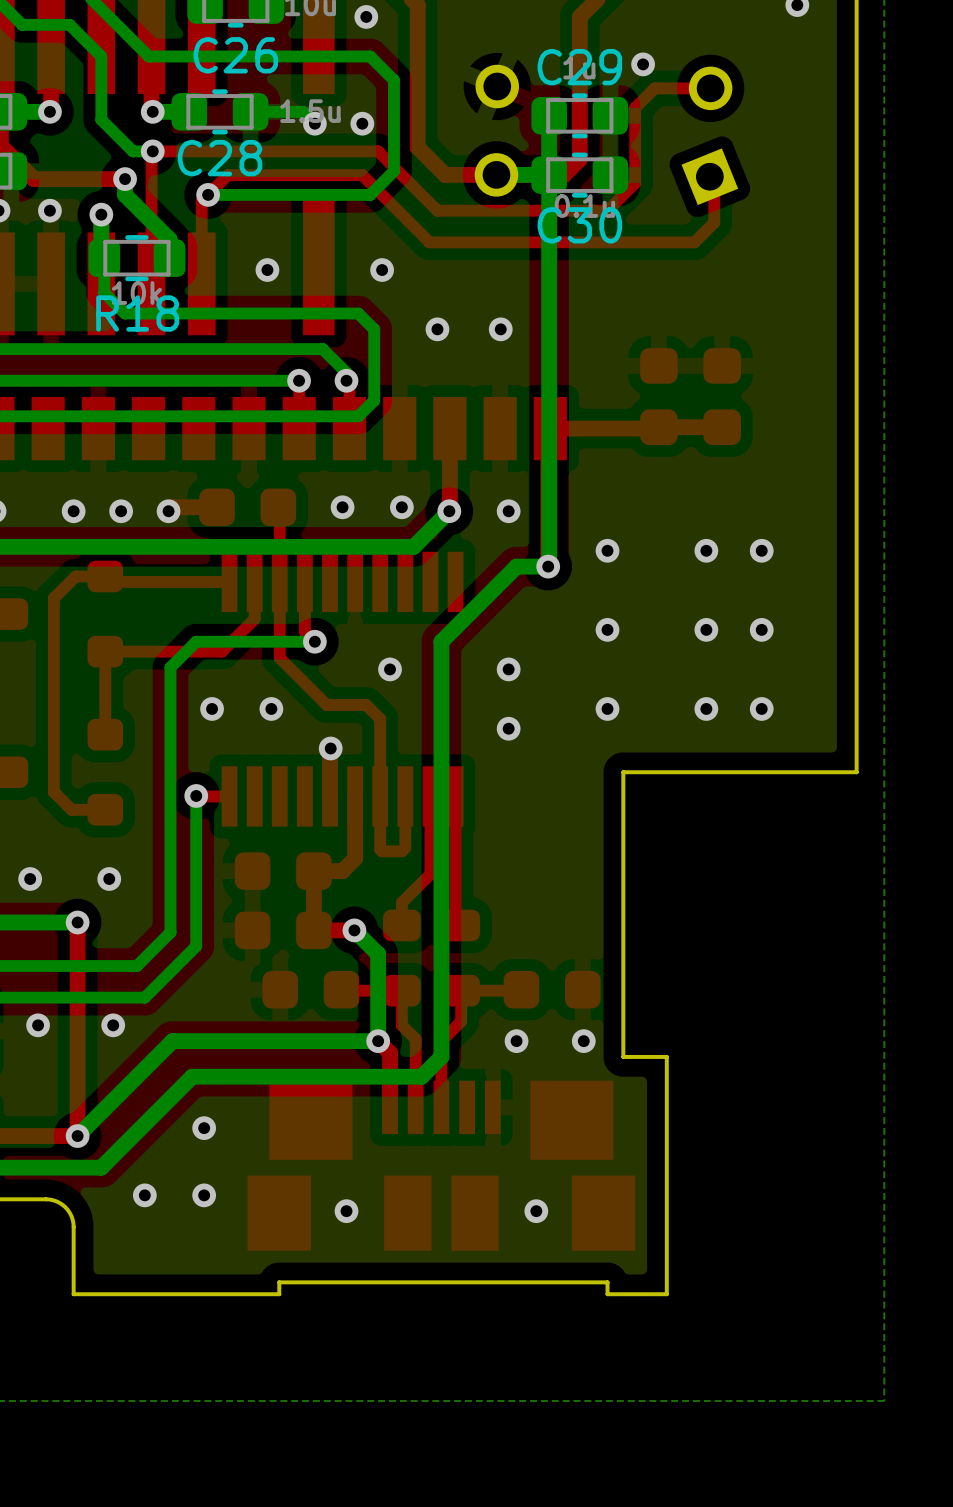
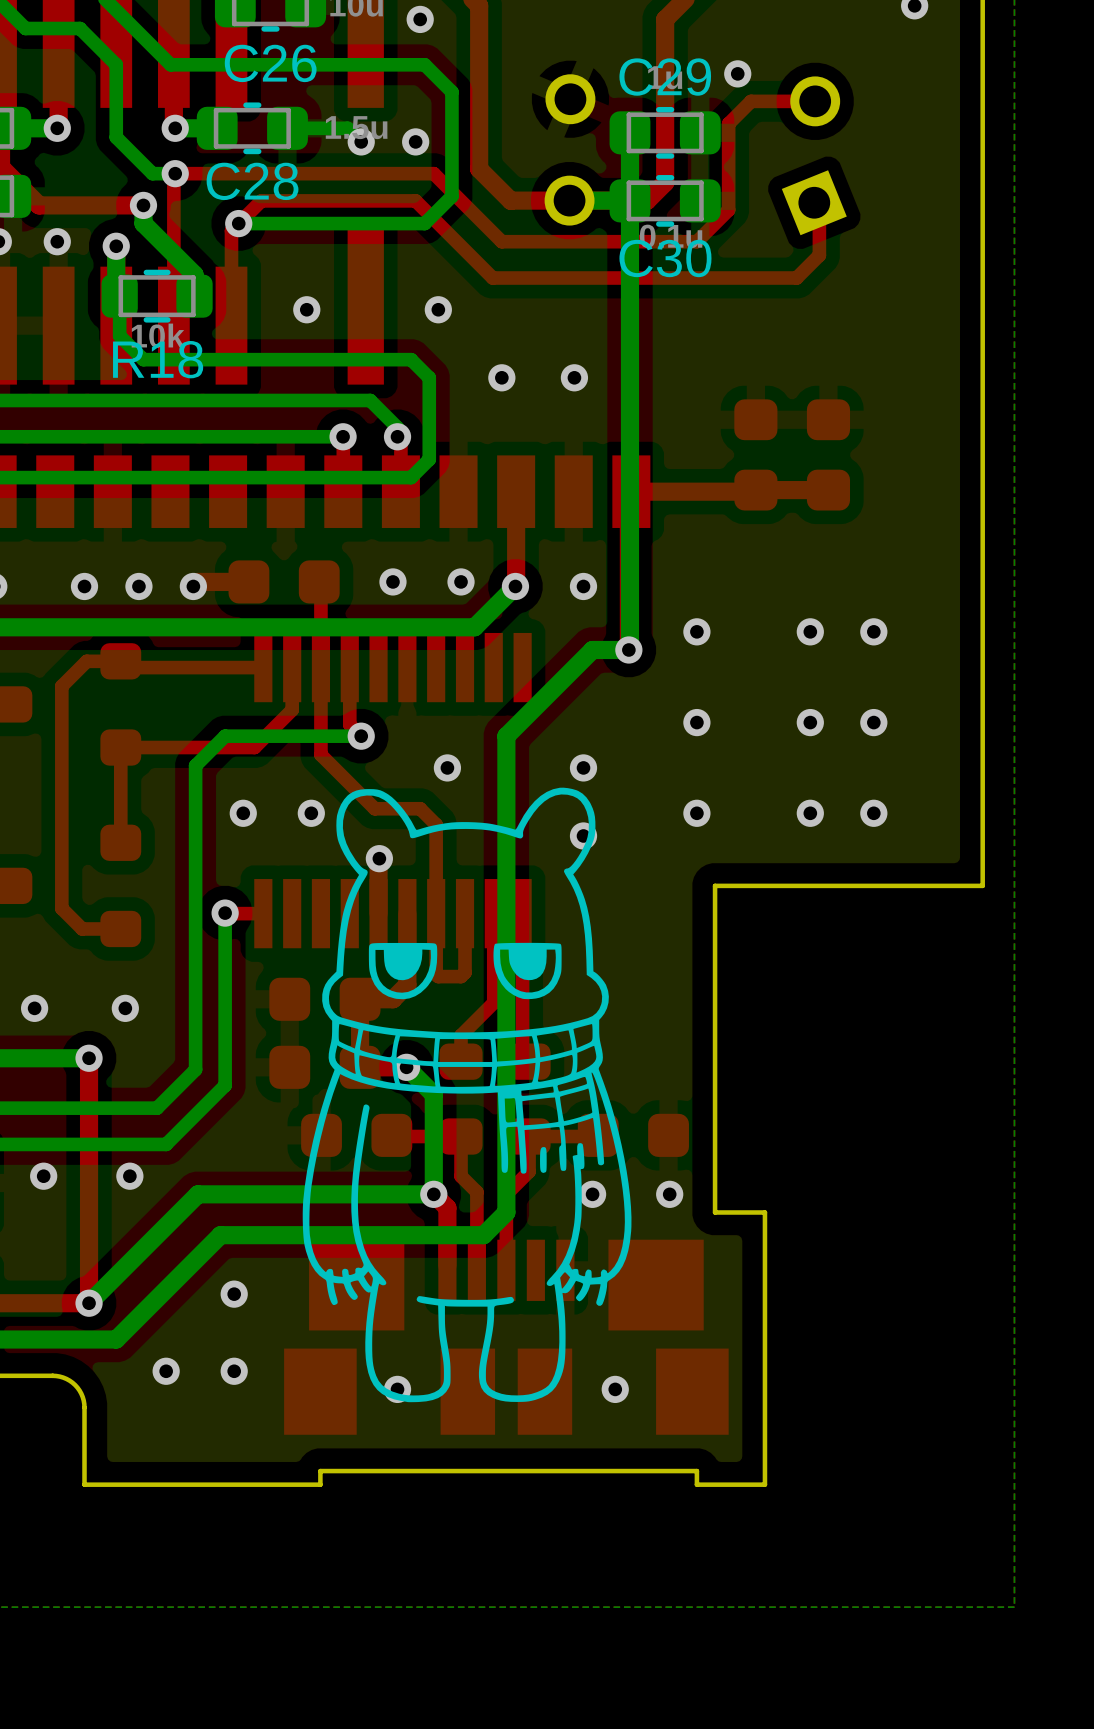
drawing: none -> [302, 787, 632, 1403]

